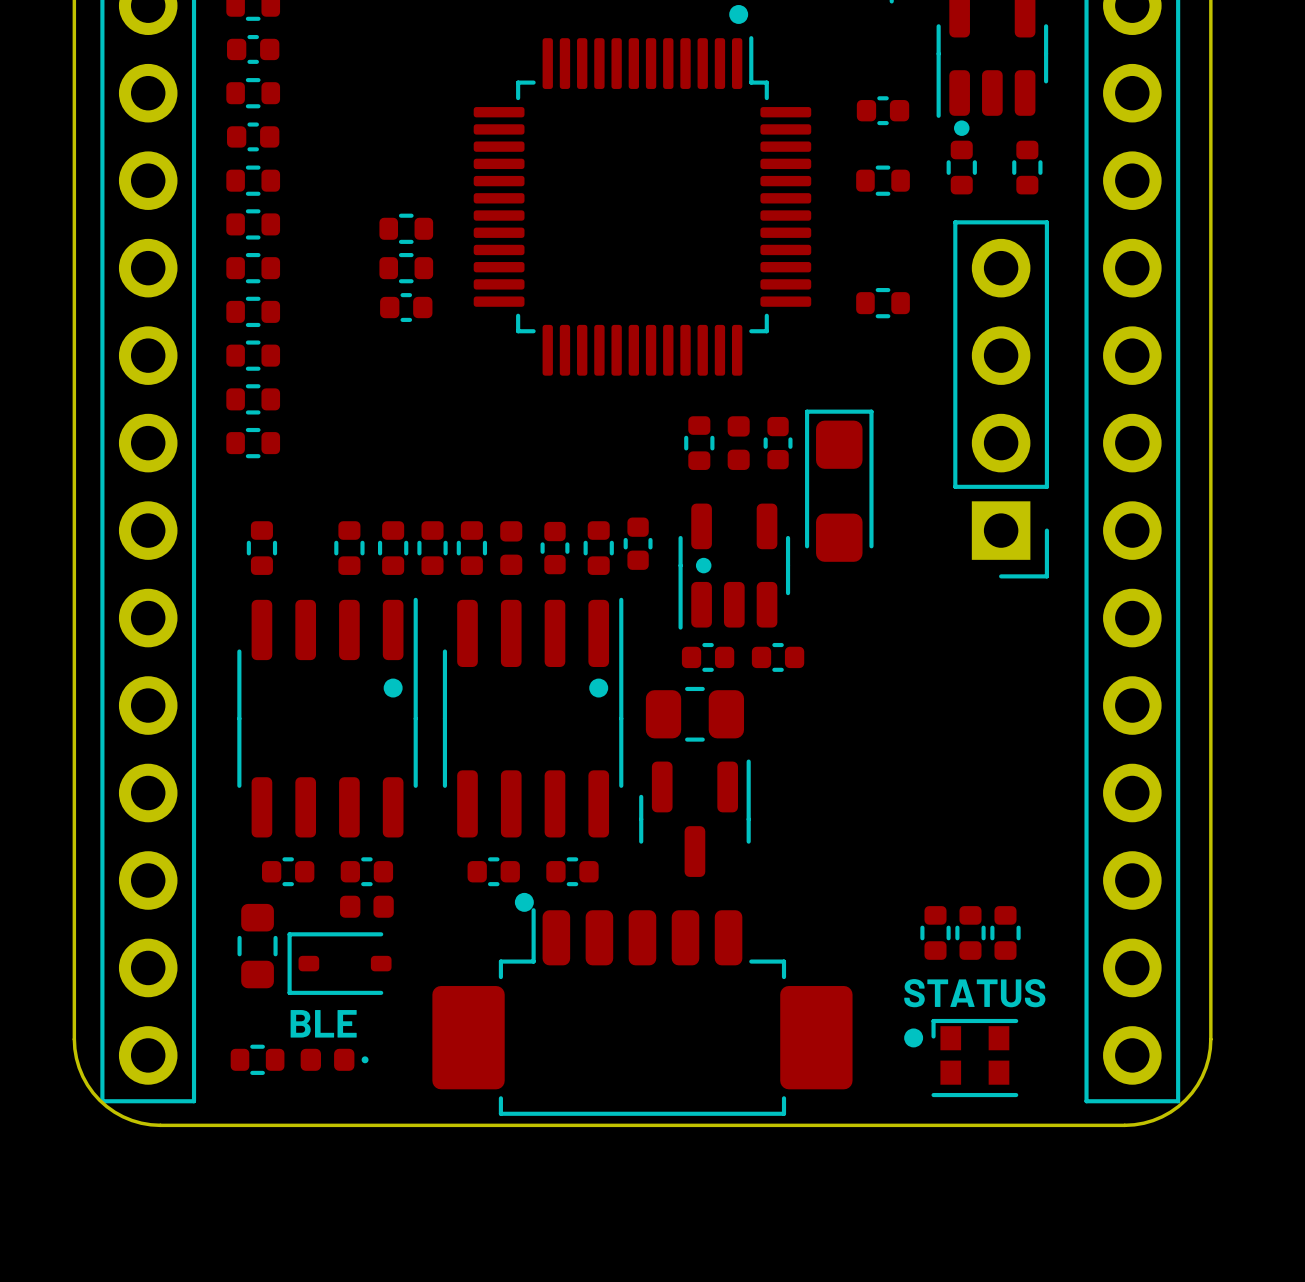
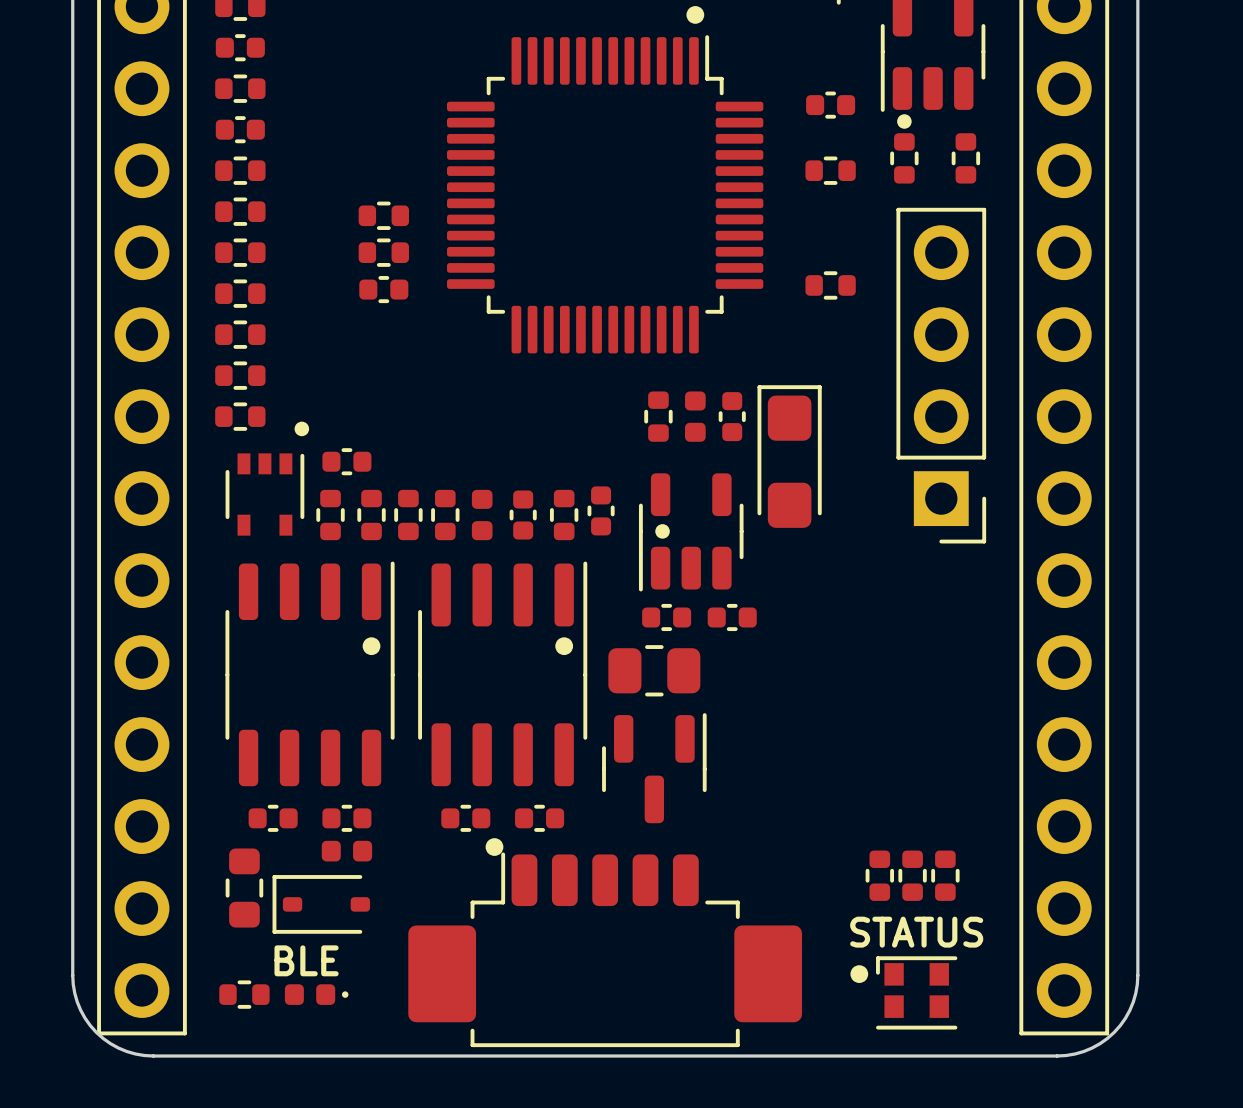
drawing: none -> [294, 421, 310, 437]
part: none -> (346, 461)
part footprint: [246, 521, 278, 575] -> [225, 453, 305, 536]

